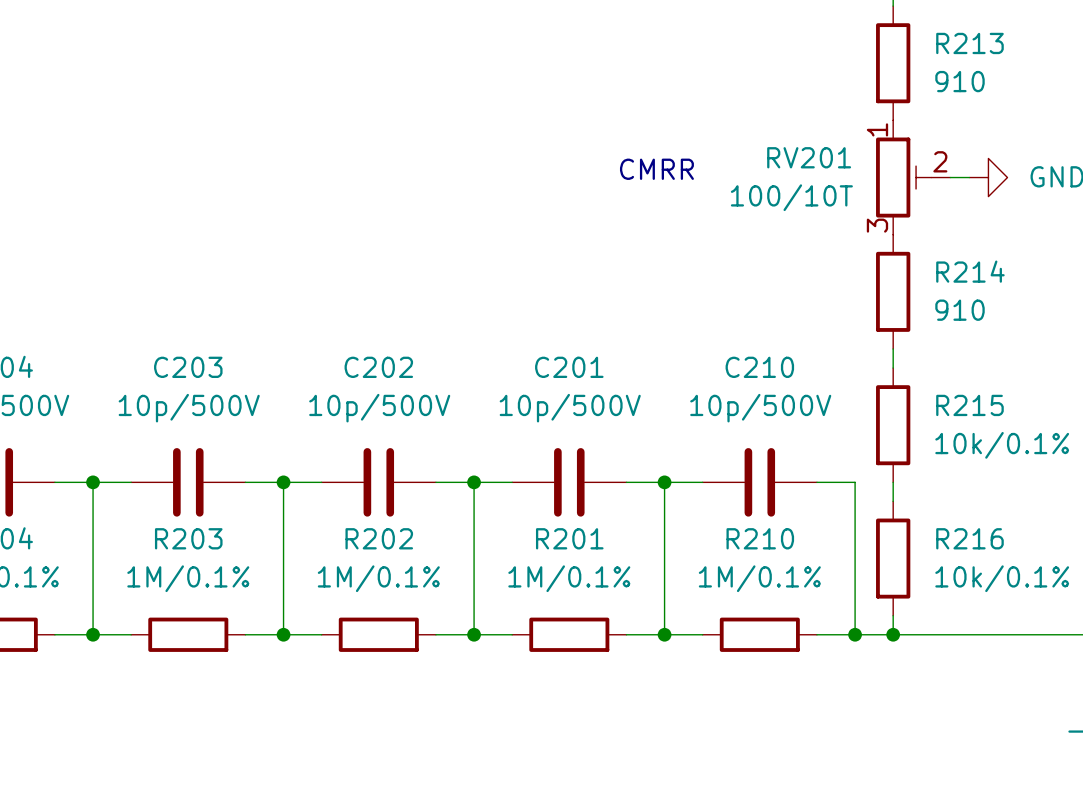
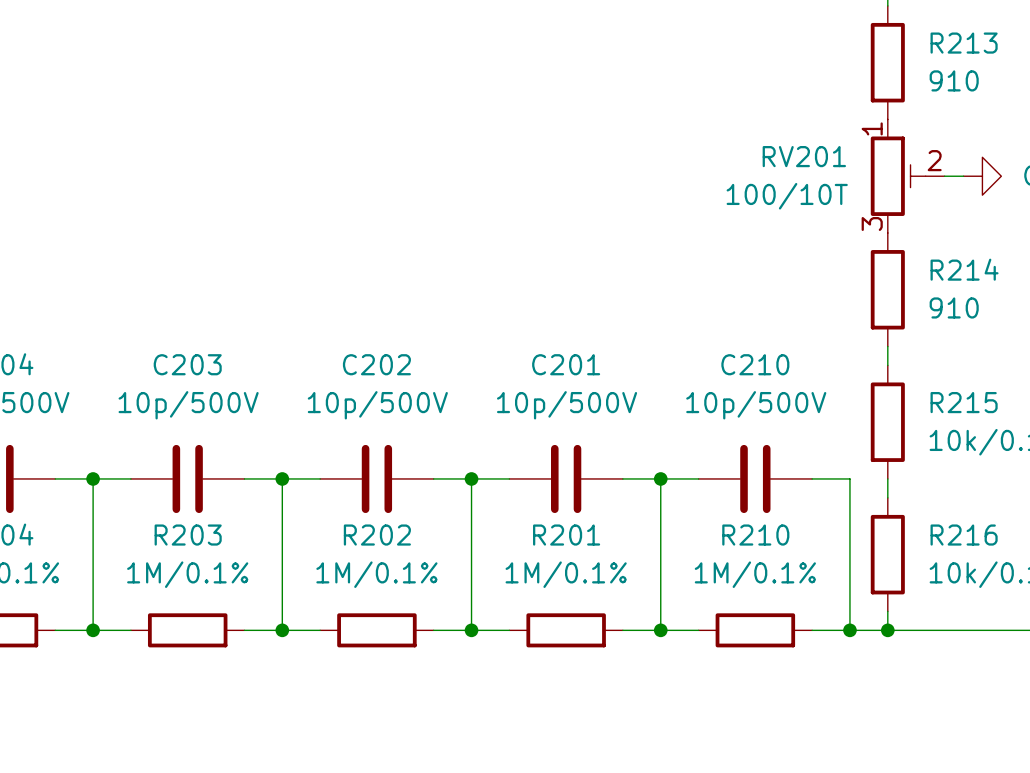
text: CMRR (656, 169) -> none

